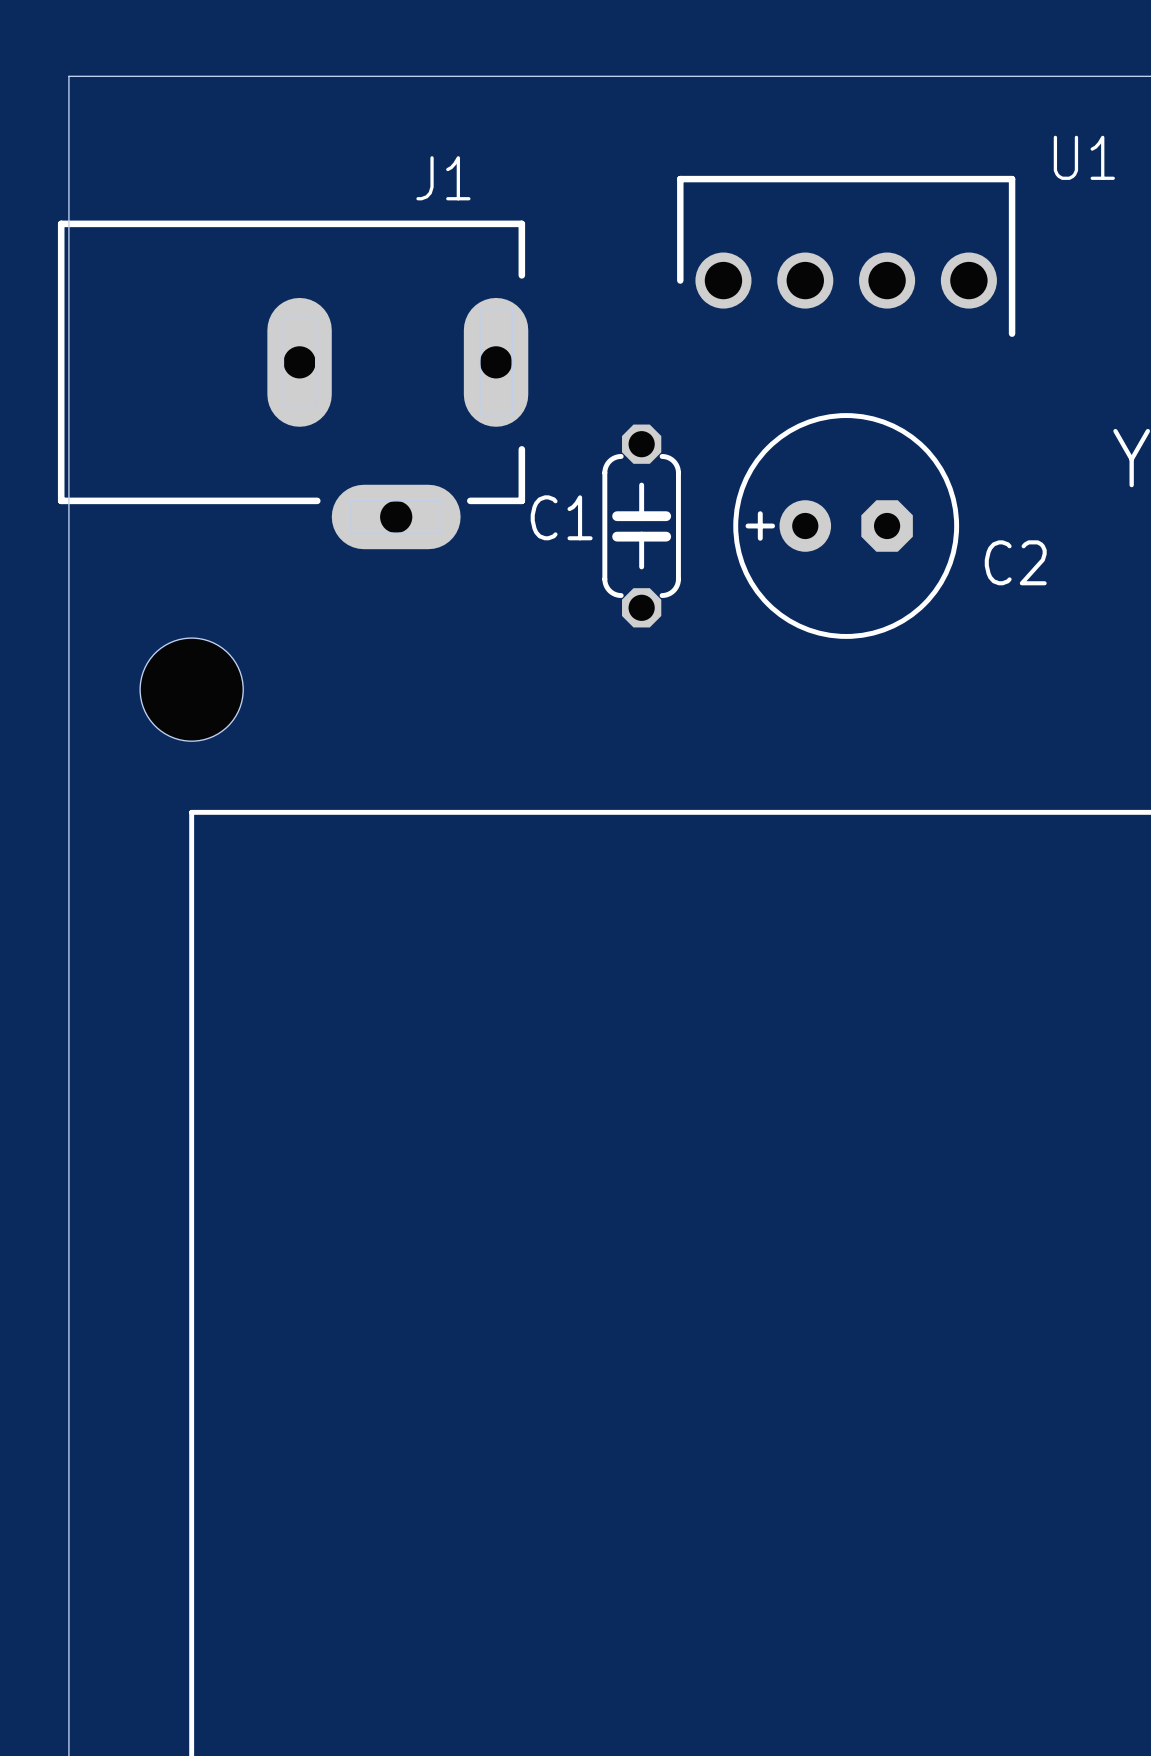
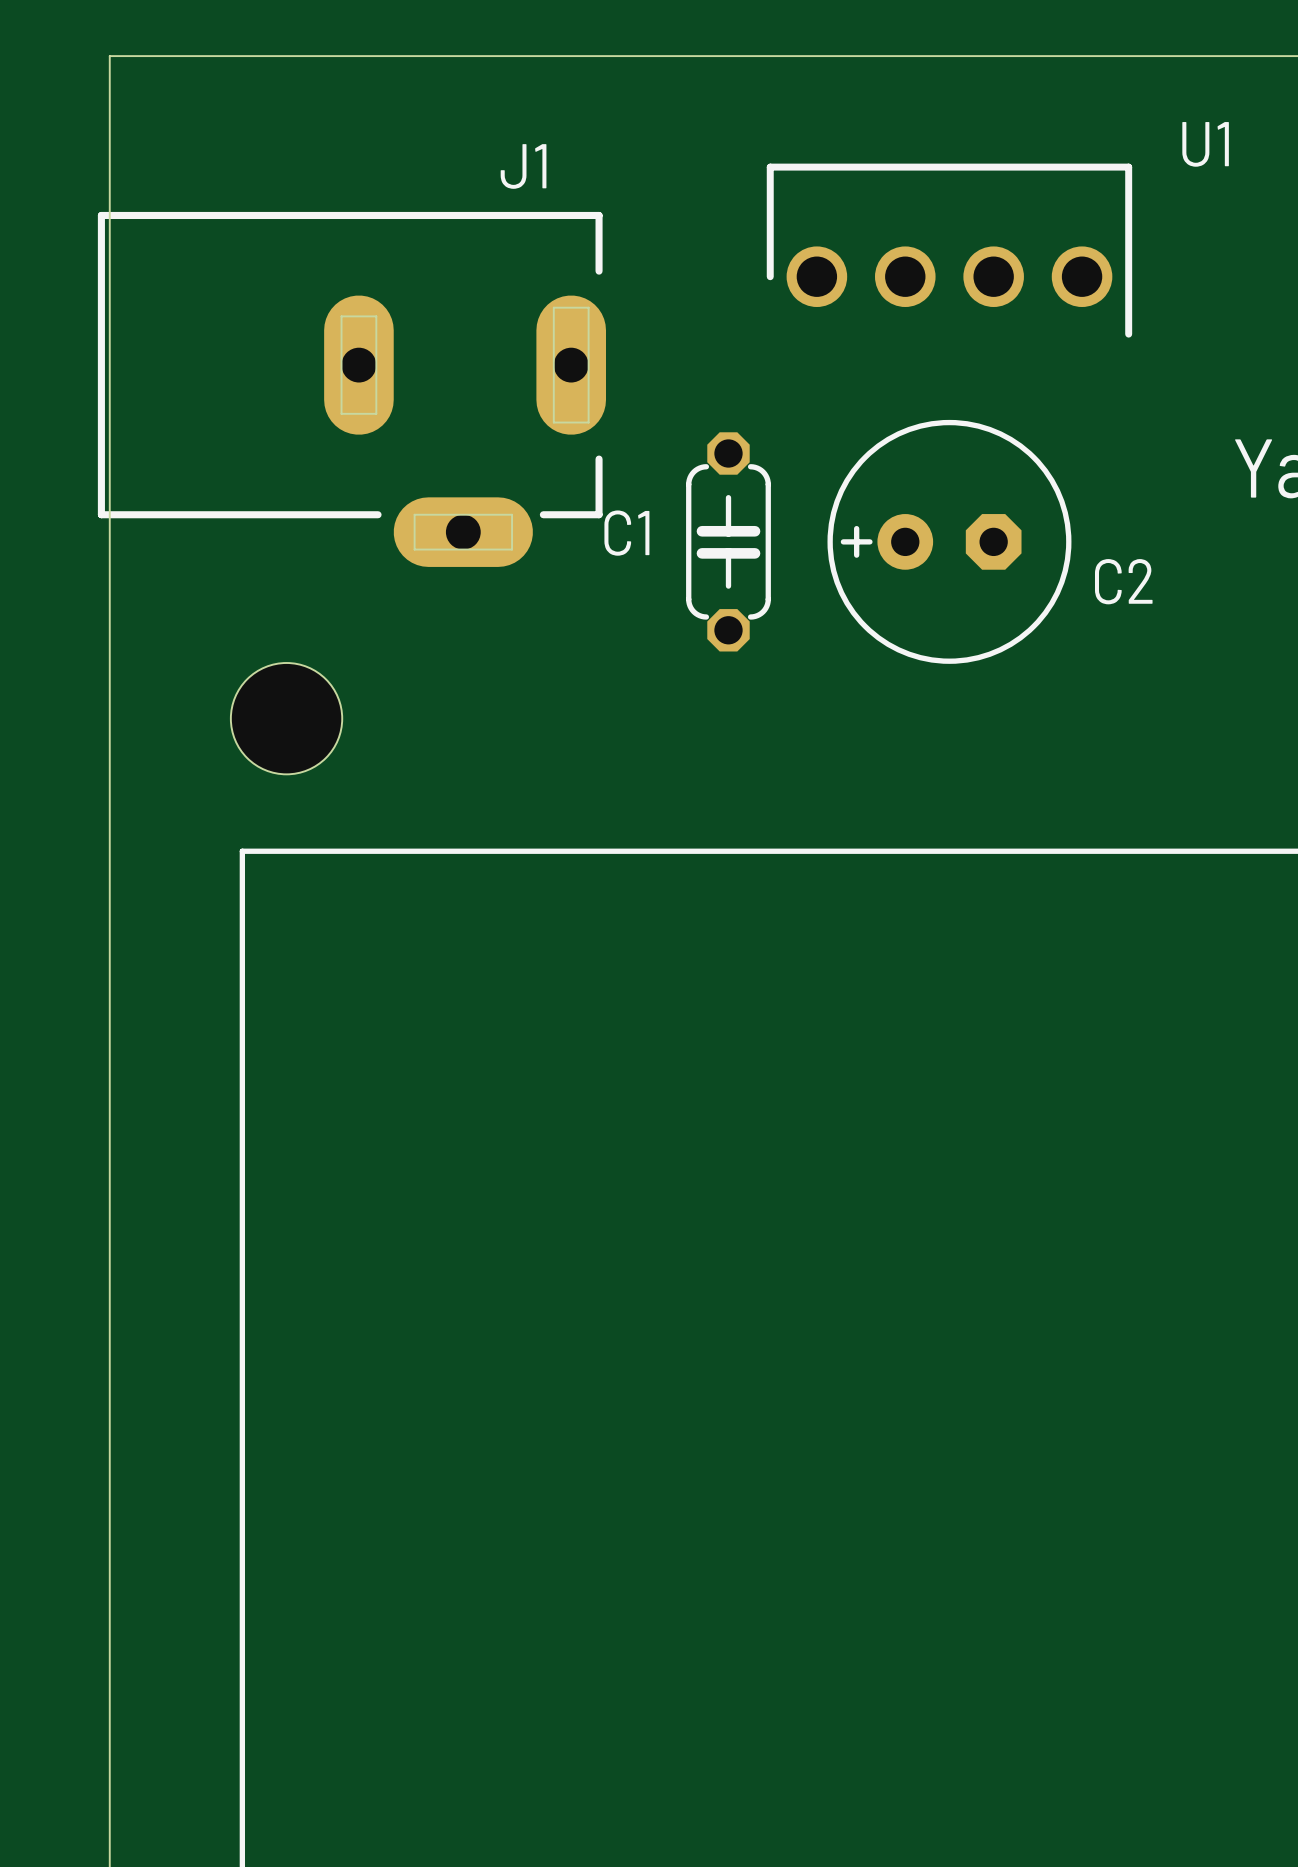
hole position: (191, 689) -> (286, 718)

